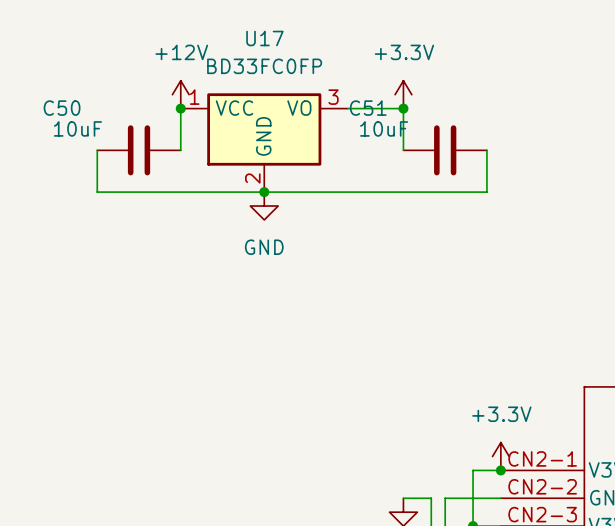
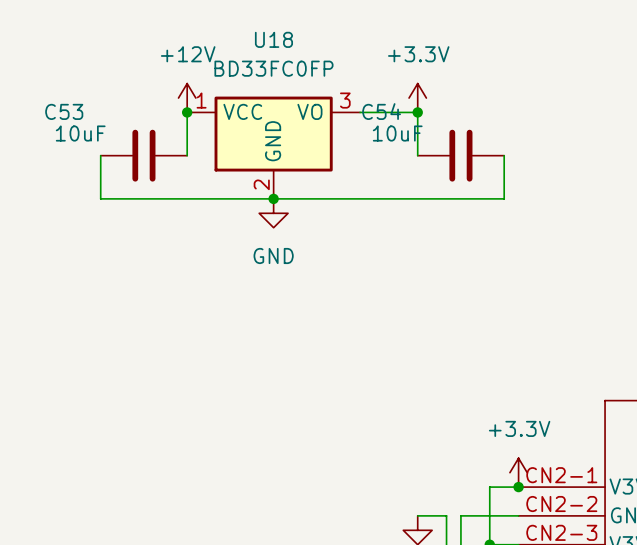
U17 name: U17 (264, 38) -> U18 (273, 39)
C50 name: C50 (62, 108) -> C53 (64, 111)
C51 name: C51 (368, 108) -> C54 (381, 111)

